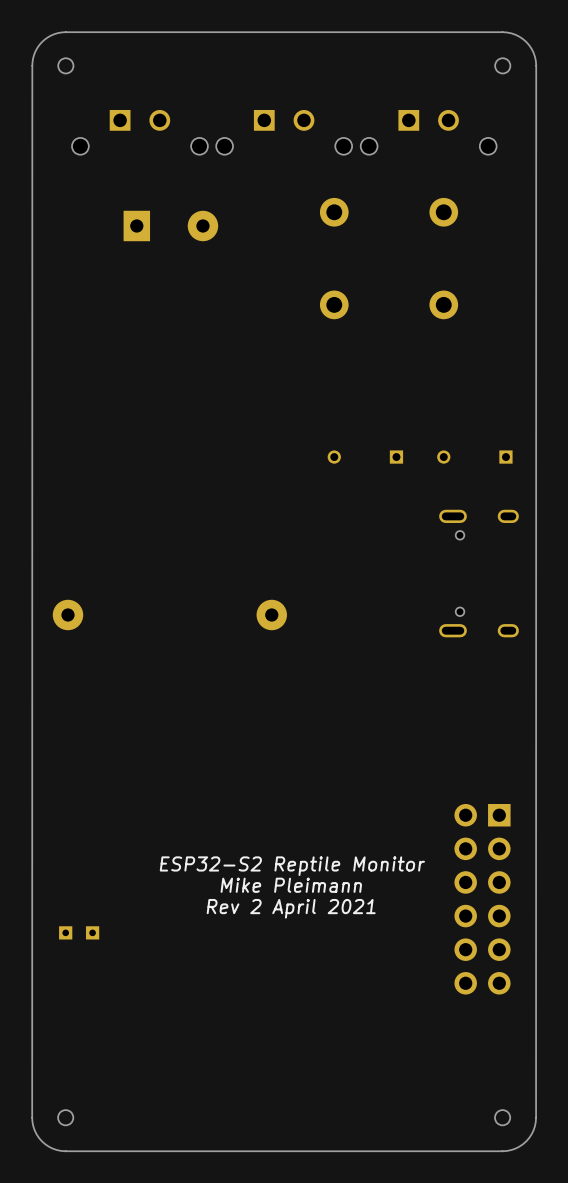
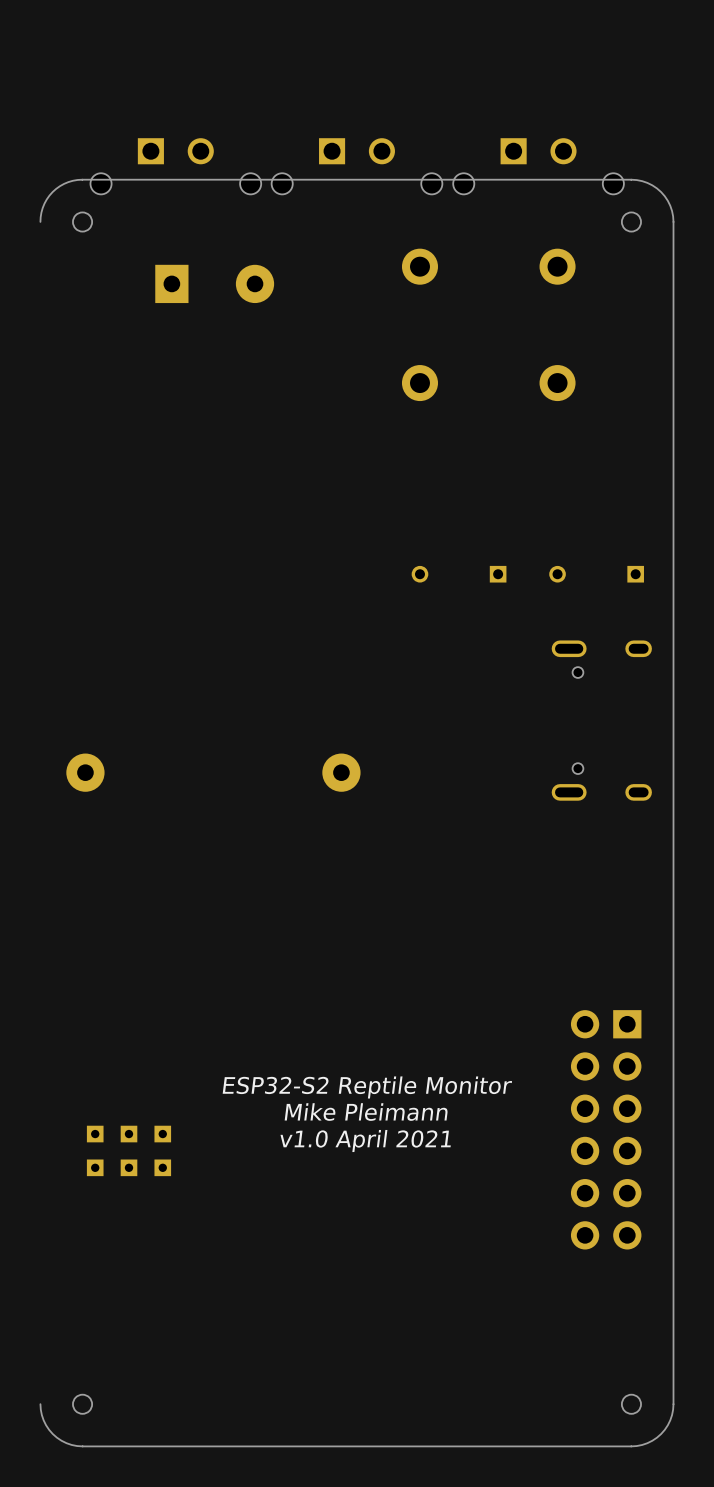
round board edge position: (65, 65) -> (82, 222)
round board edge position: (502, 65) -> (631, 222)
part: none -> (95, 1134)
part: none -> (128, 1134)
part: none -> (162, 1134)
text: Rev 2 April 2021 (291, 908) -> v1.0 April 2021 (365, 1141)
part: none -> (95, 1167)
part: none -> (128, 1167)
part: none -> (162, 1167)
part: (65, 932) -> none
part: (92, 932) -> none
board edge: (536, 1117) (536, 65) (533, 52) (526, 42) (515, 34) (502, 32) (65, 32) (47, 37) (35, 51) (32, 65) (32, 1117) -> (673, 1404) (673, 221) (667, 200) (652, 185) (631, 179) (82, 179) (64, 183) (52, 192) (42, 207) (40, 221)

